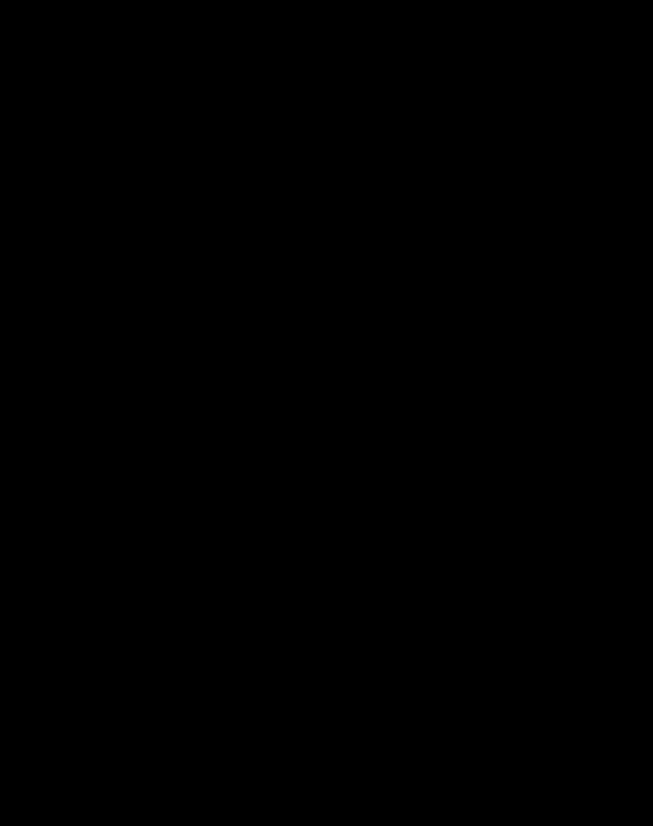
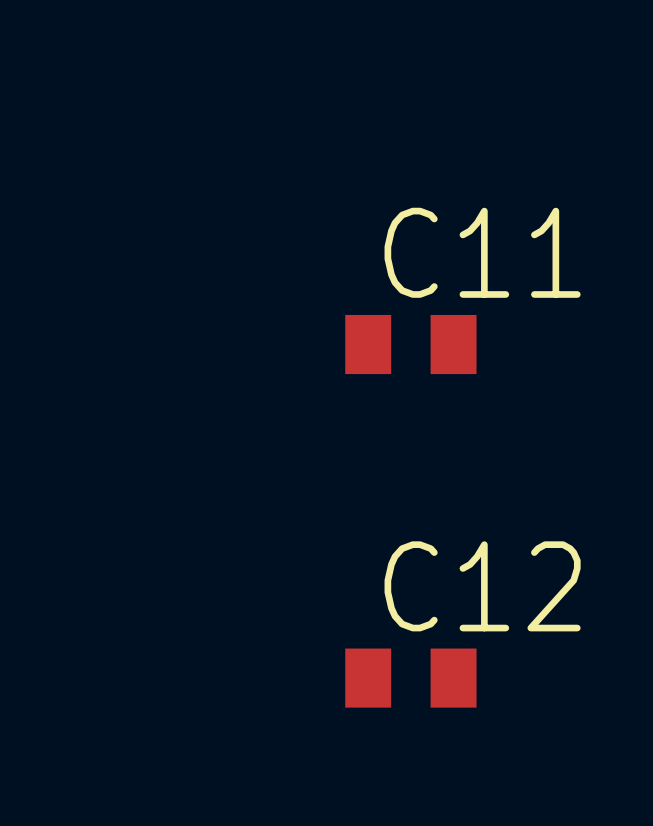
C11: none -> (410, 344)
C12: none -> (410, 678)

